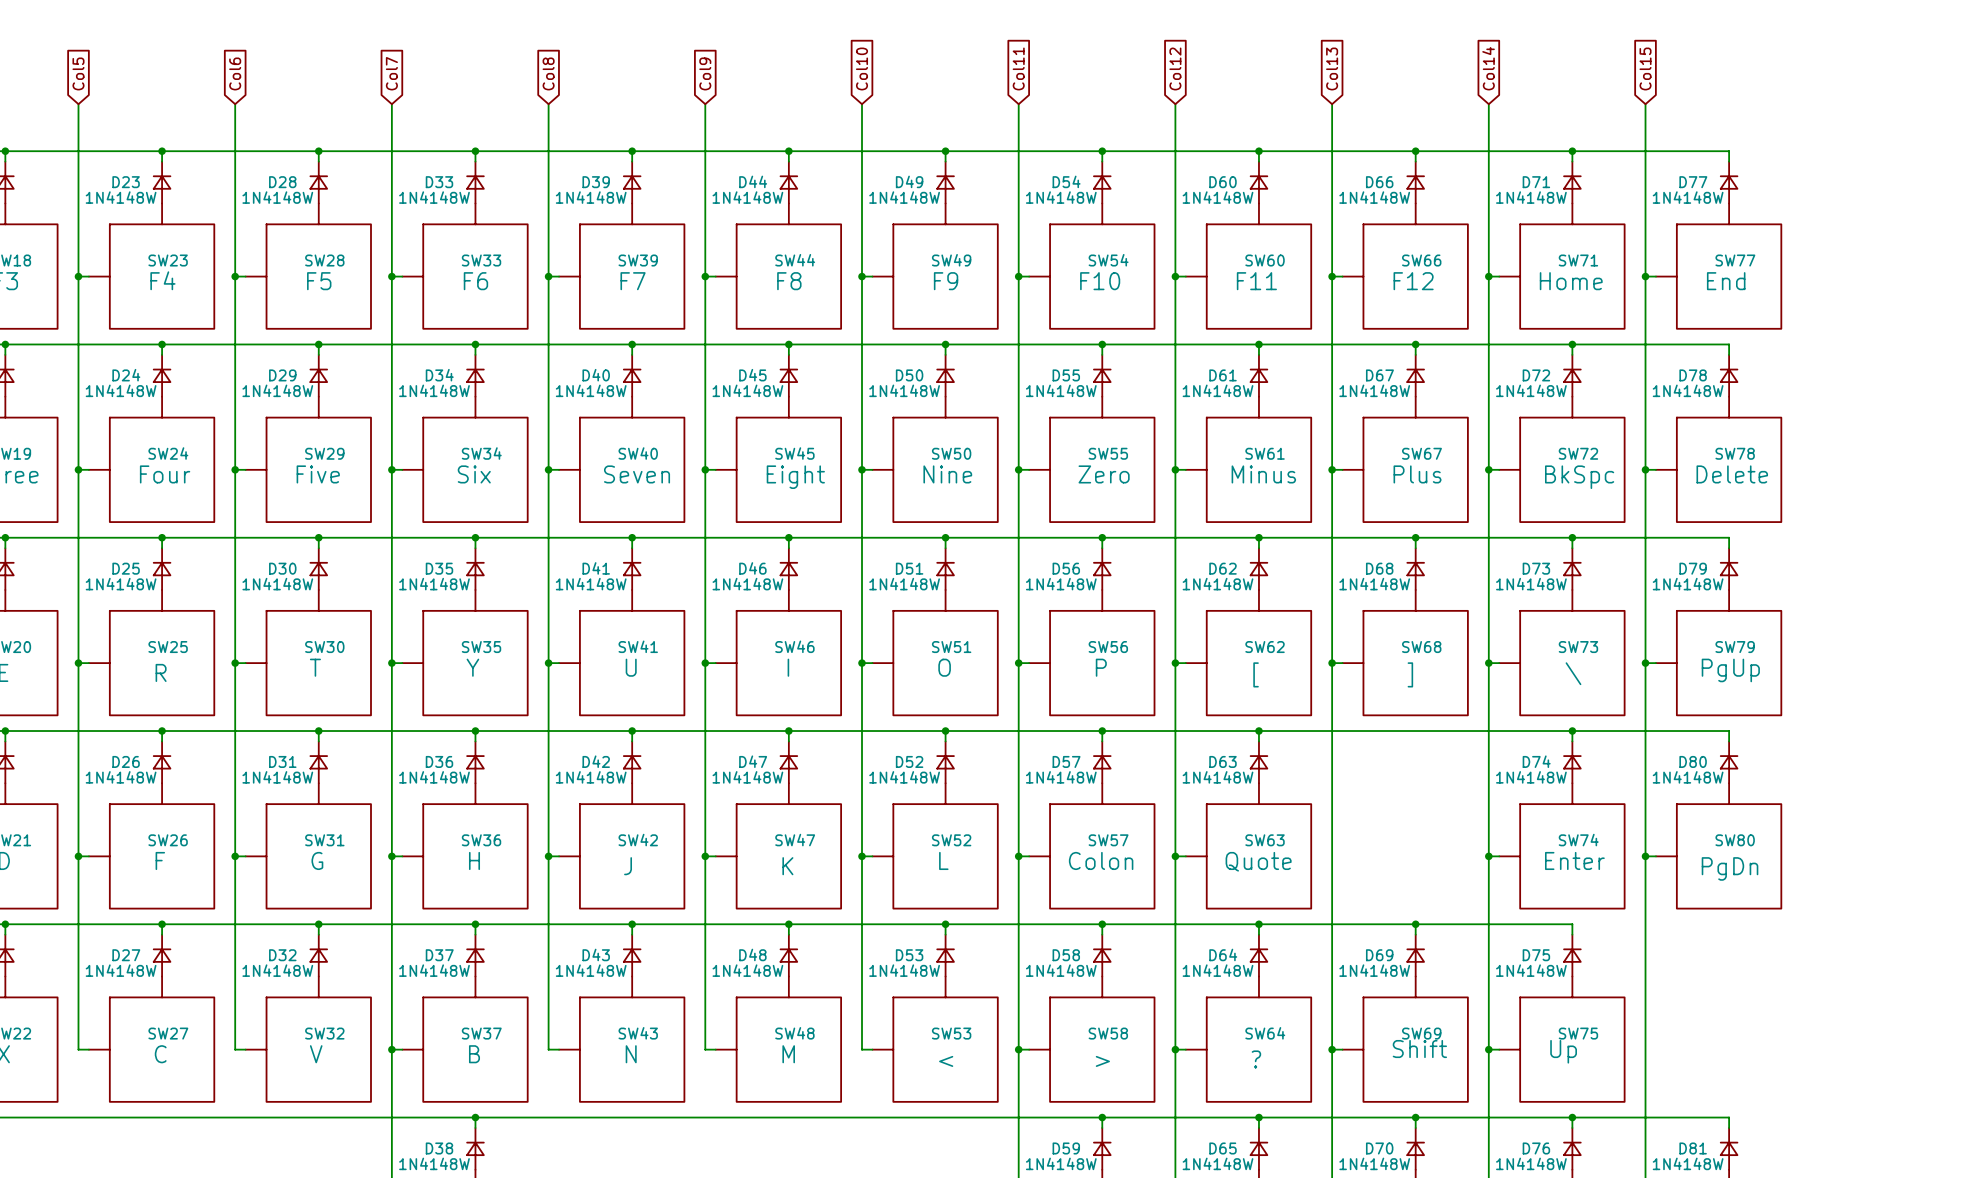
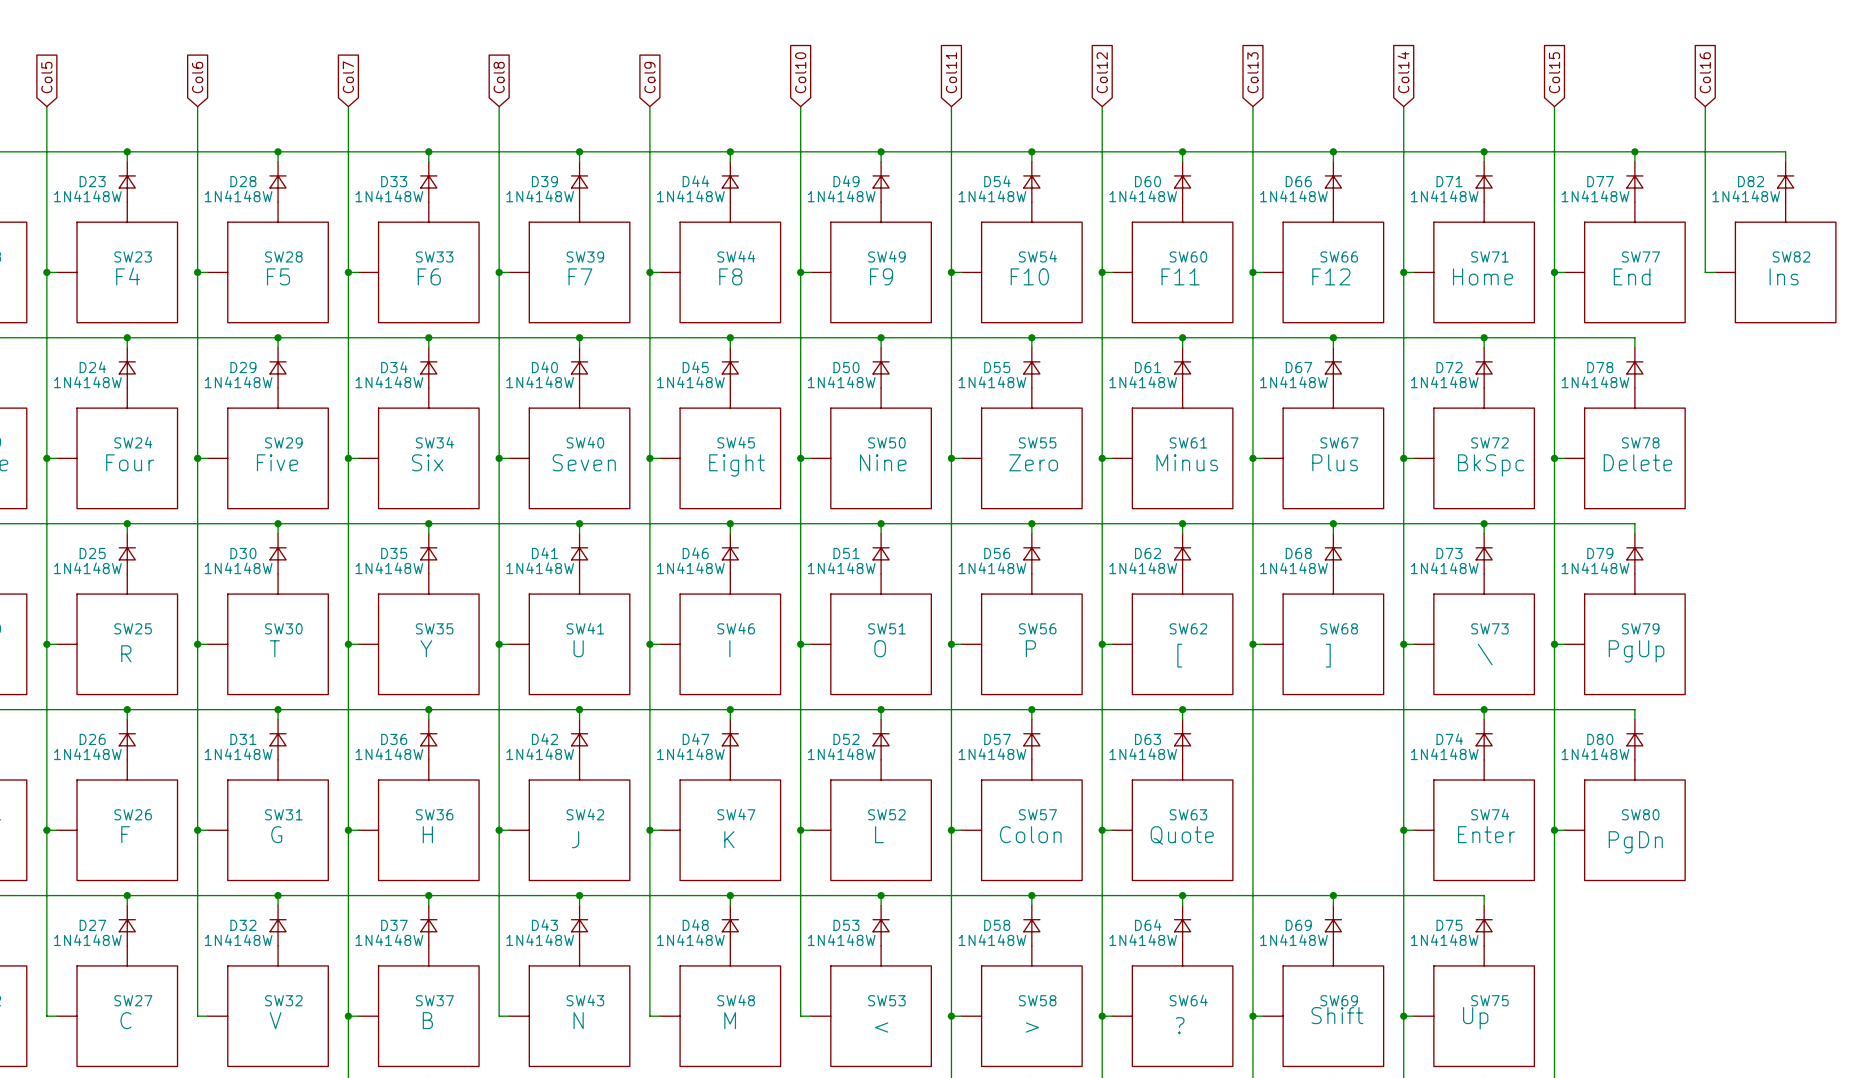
global label: none -> Col16 (1705, 72)
wire: none -> (1705, 106) (1705, 272) (1715, 272)
wire: none -> (1634, 151) (1785, 151) (1785, 161)
junction: none -> (1634, 151)
D82: none -> 1N4148W (1785, 181)
SW82: none -> Ins (1775, 262)

